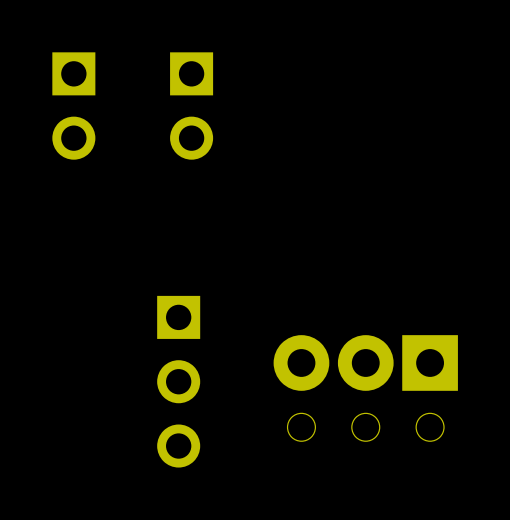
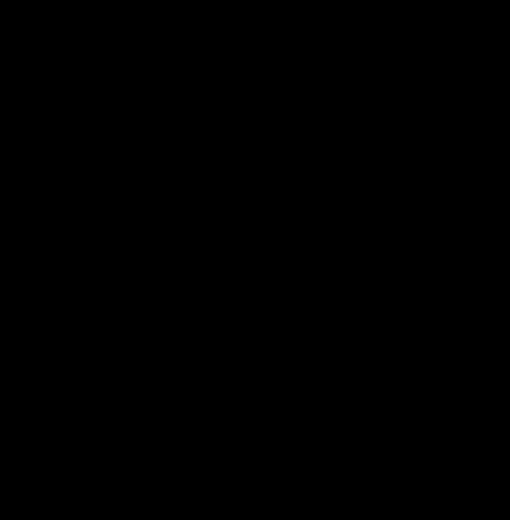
part: (73, 106) -> none
part: (191, 106) -> none
part: (178, 381) -> none
part: (365, 388) -> none

